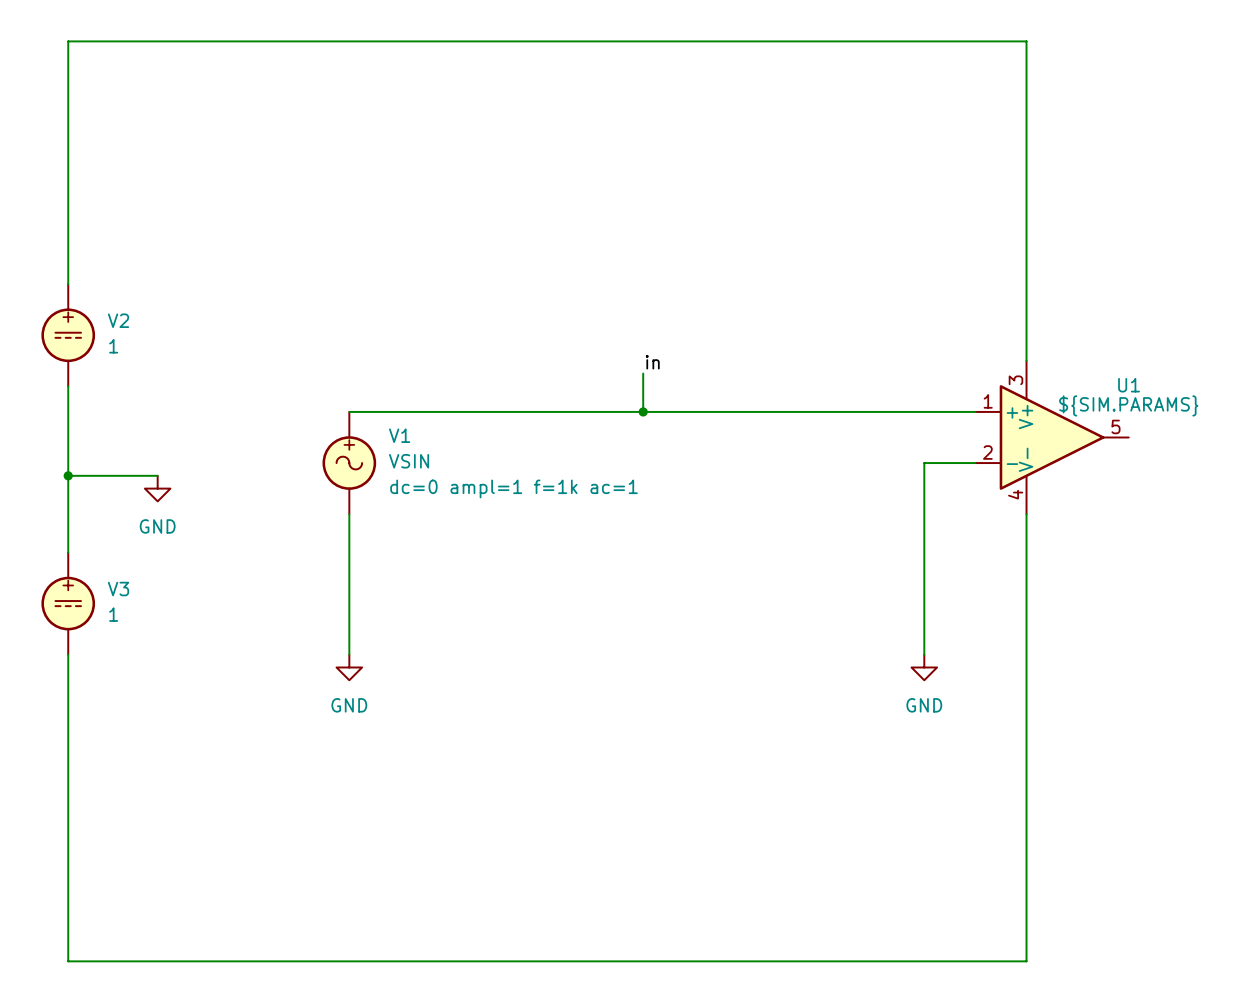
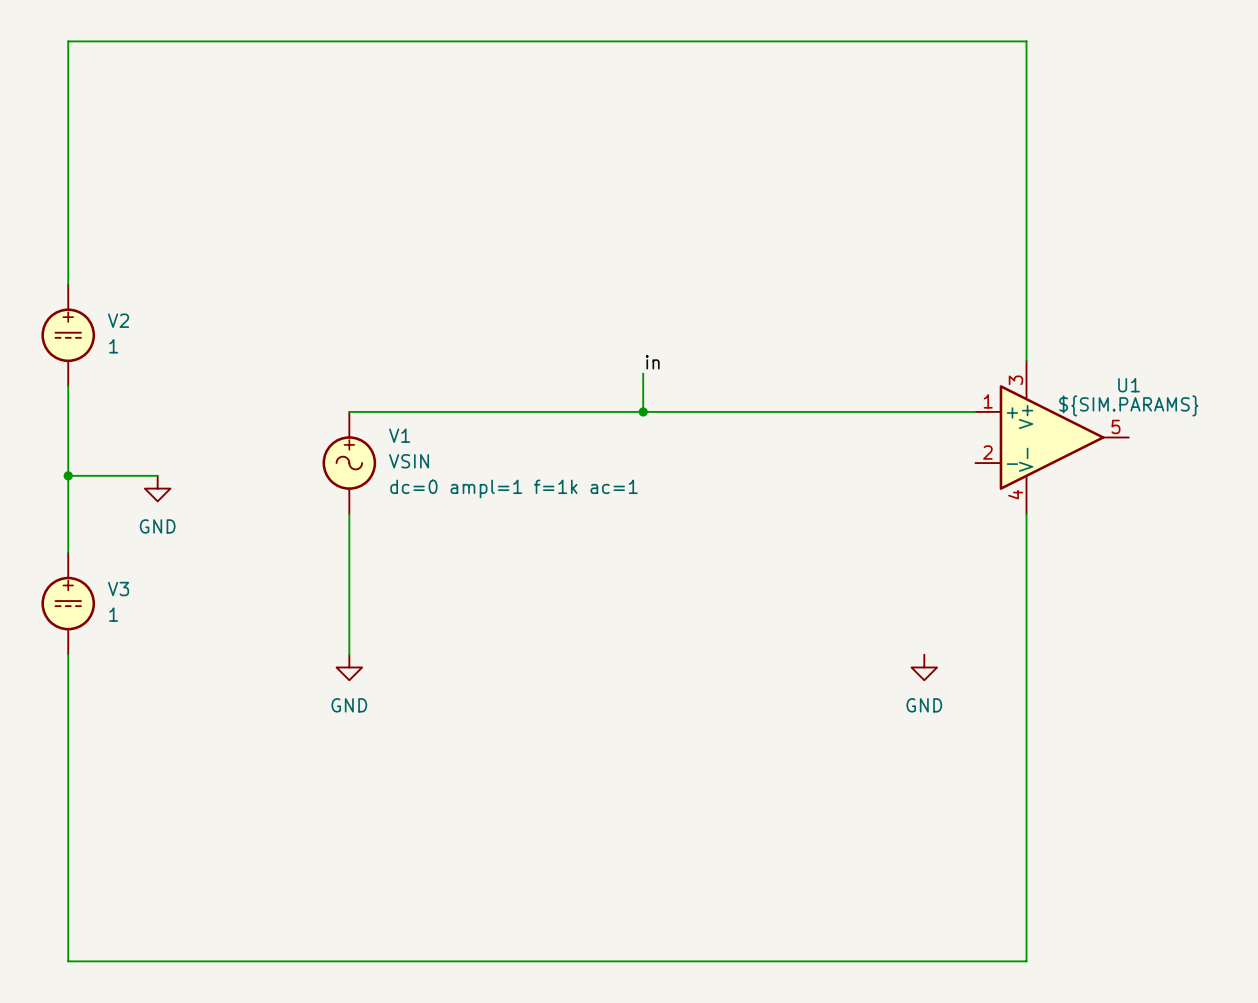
wire: (975, 463) (924, 463) (924, 654) -> none

